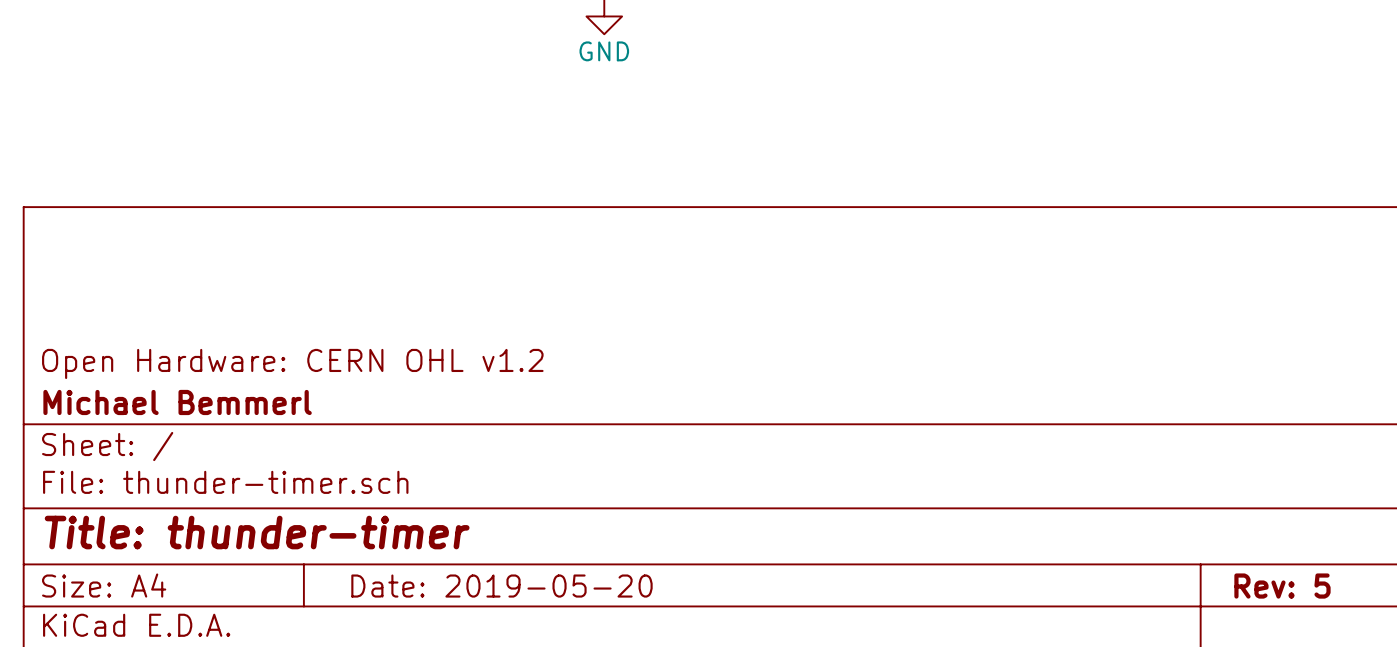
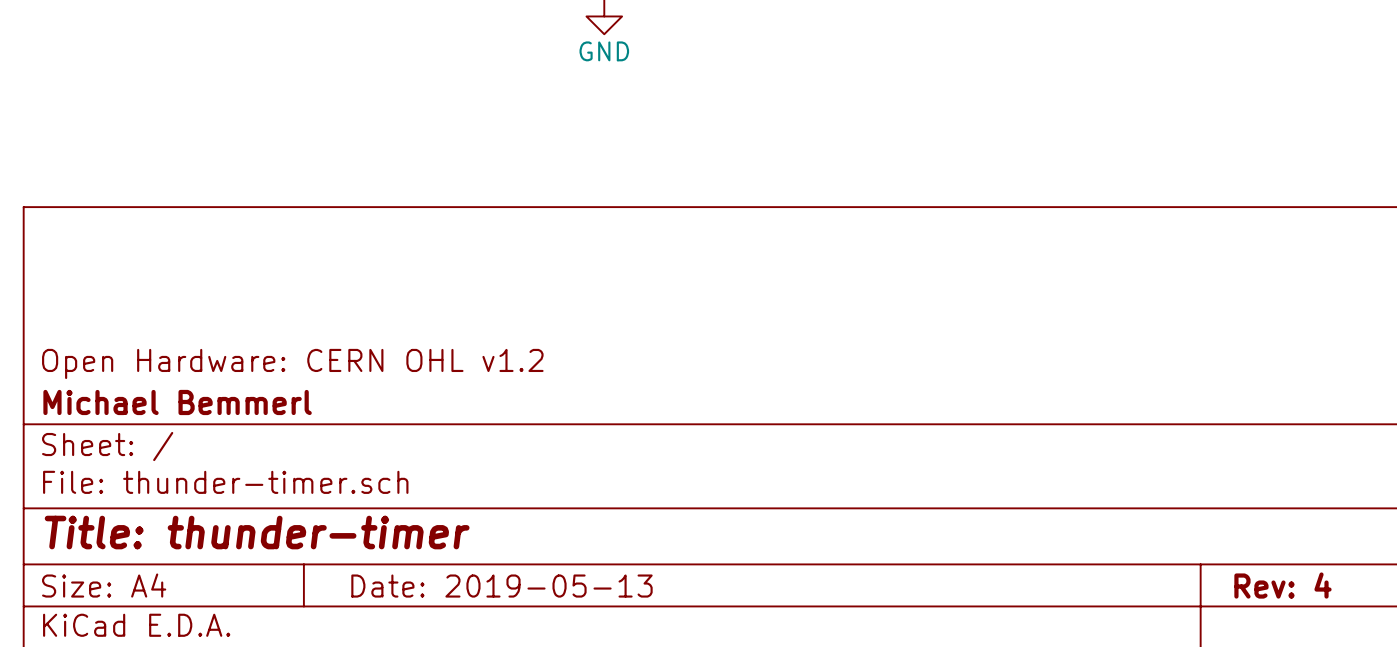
title block: Date: 2019-05-20 (501, 586) -> Date: 2019-05-13 (501, 586)
title block: Rev: 5 (1282, 586) -> Rev: 4 (1282, 585)

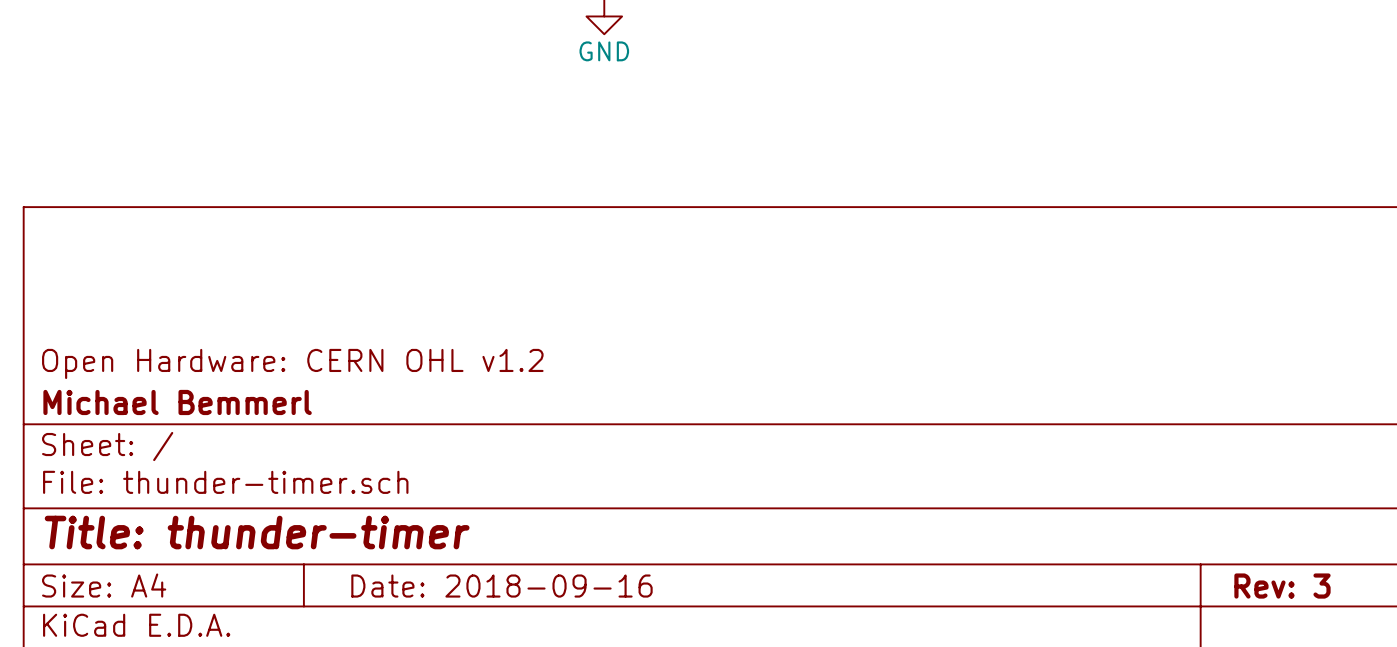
title block: Rev: 4 (1282, 585) -> Rev: 3 (1282, 586)
title block: Date: 2019-05-13 (501, 586) -> Date: 2018-09-16 (501, 586)

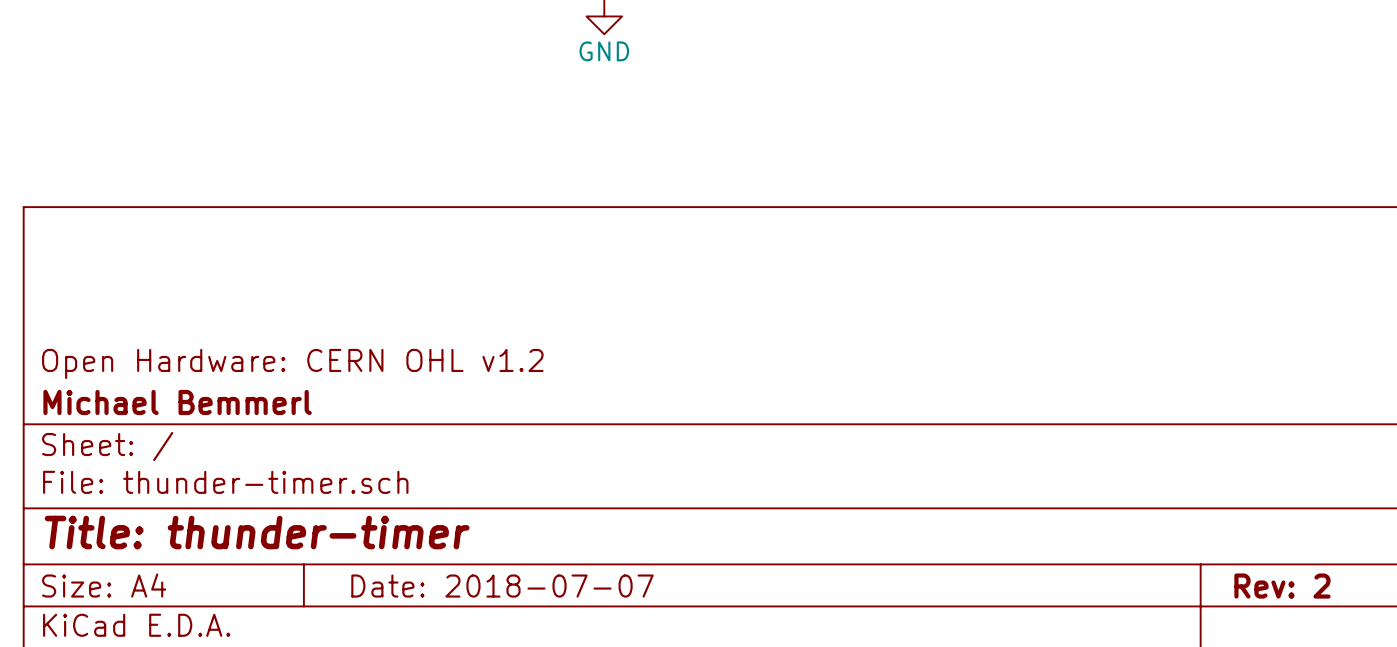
title block: Date: 2018-09-16 (501, 586) -> Date: 2018-07-07 (502, 586)
title block: Rev: 3 (1282, 586) -> Rev: 2 (1282, 586)

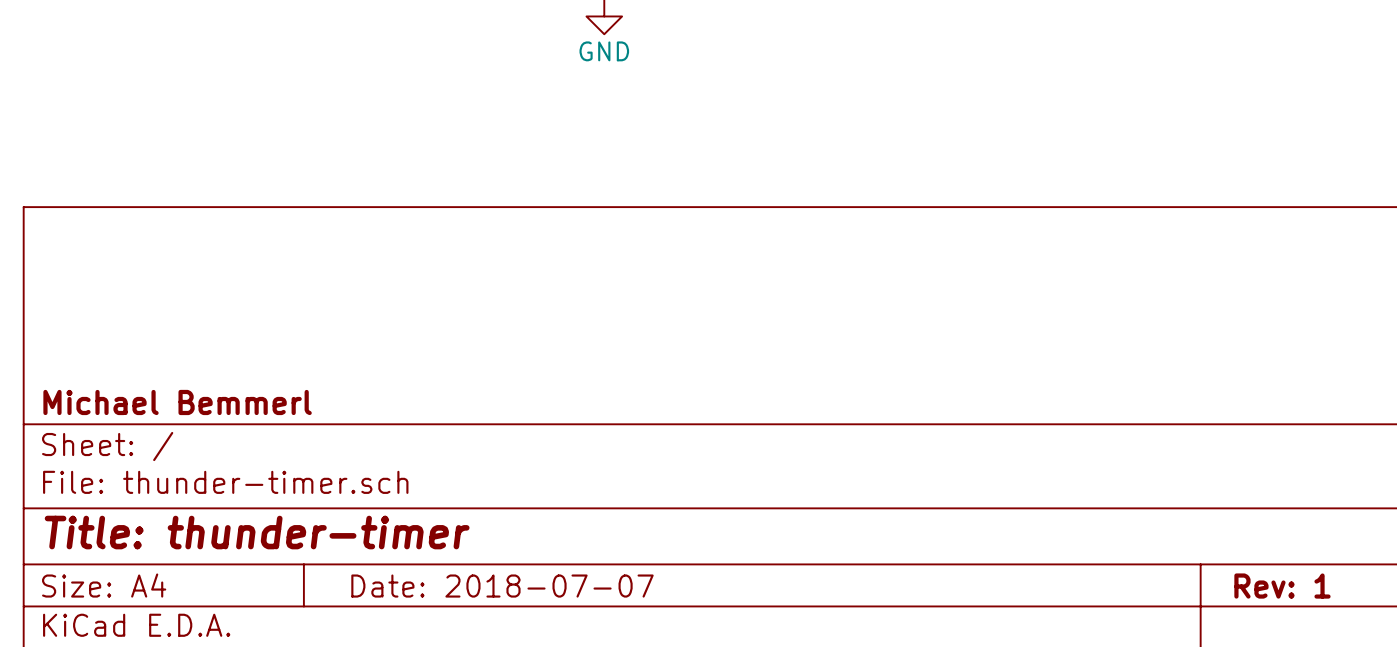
title block: Open Hardware: CERN OHL v1.2 (292, 363) -> none
title block: Rev: 2 (1282, 586) -> Rev: 1 (1282, 586)

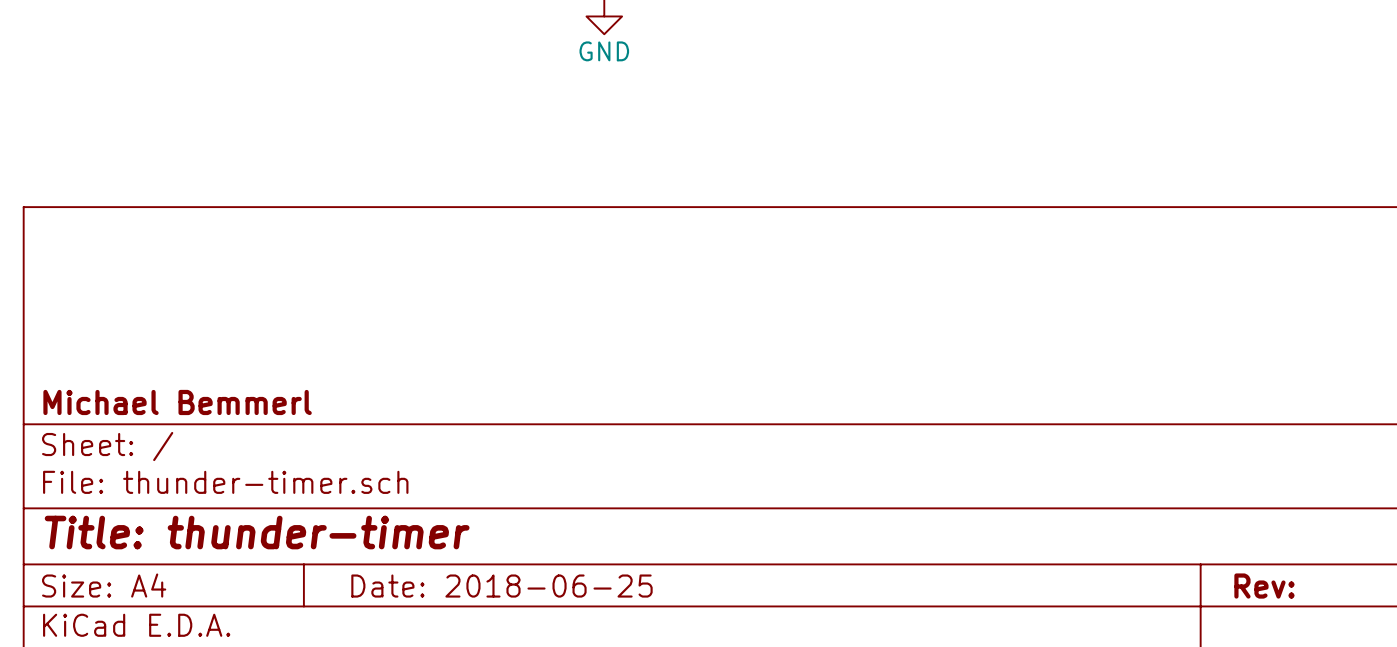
title block: Date: 2018-07-07 (502, 586) -> Date: 2018-06-25 (501, 586)
title block: Rev: 1 (1282, 586) -> Rev: (1264, 586)

